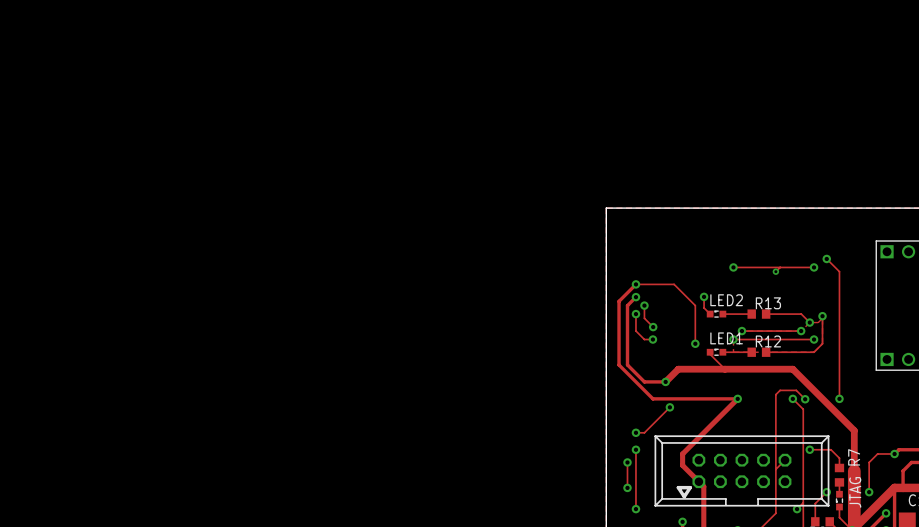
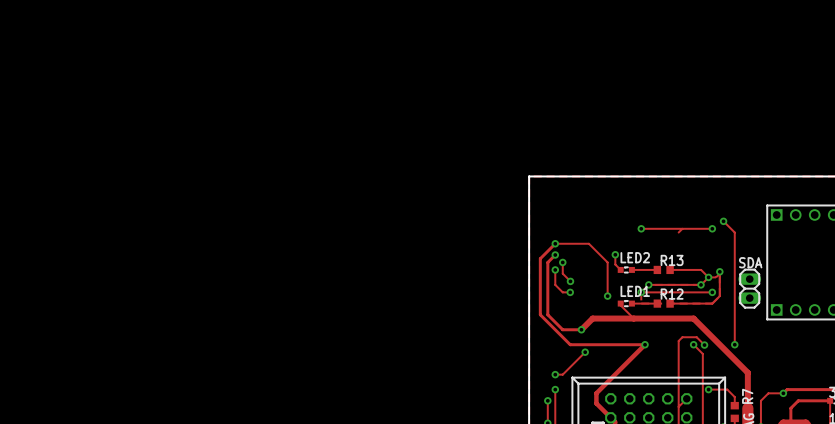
via: (775, 271) -> none
SDA: none -> (749, 288)

